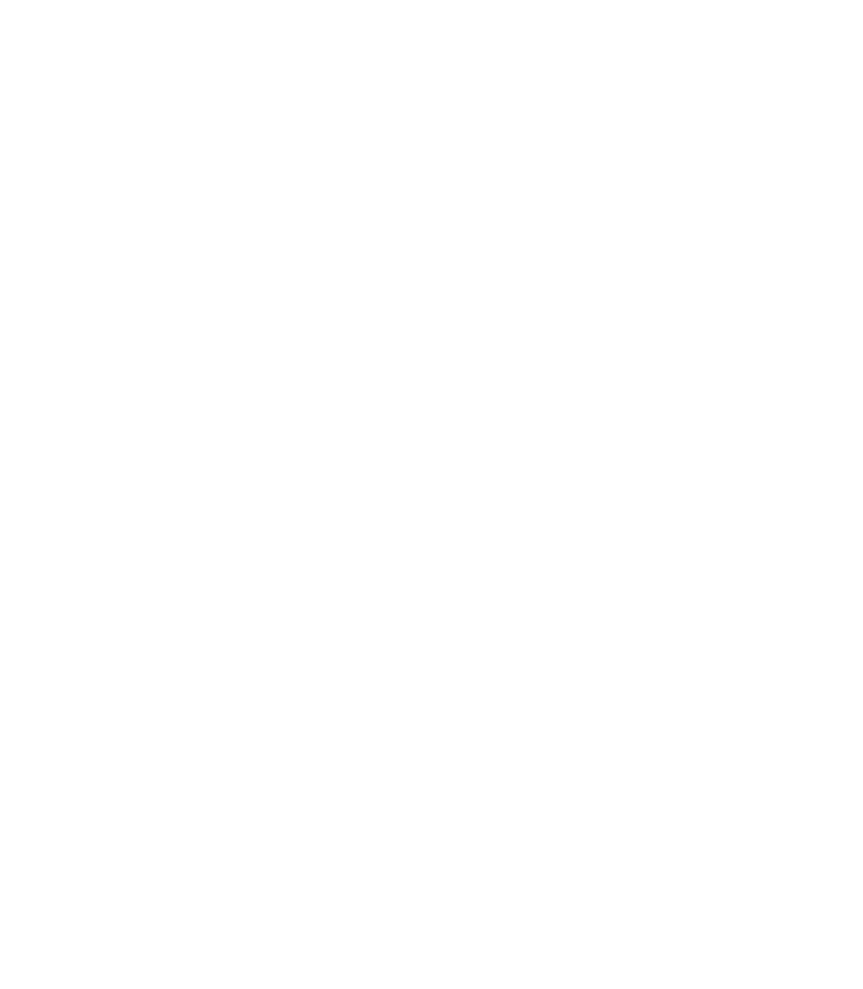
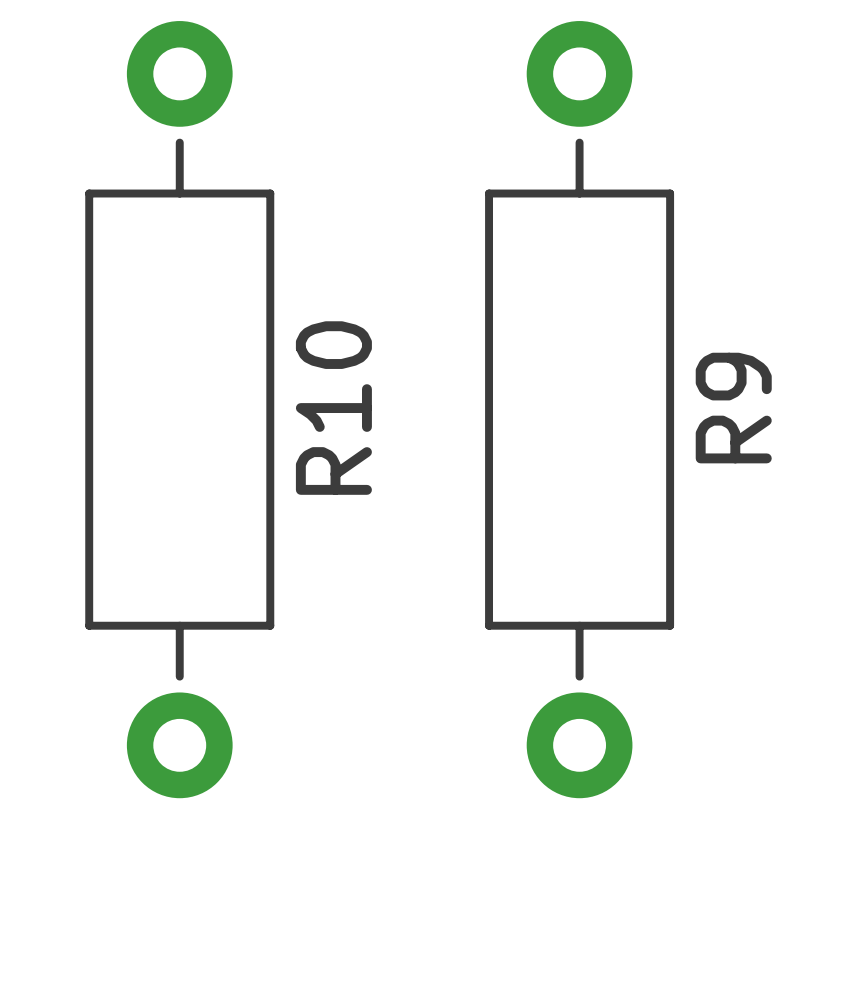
R10: none -> (179, 409)
R9: none -> (579, 409)

